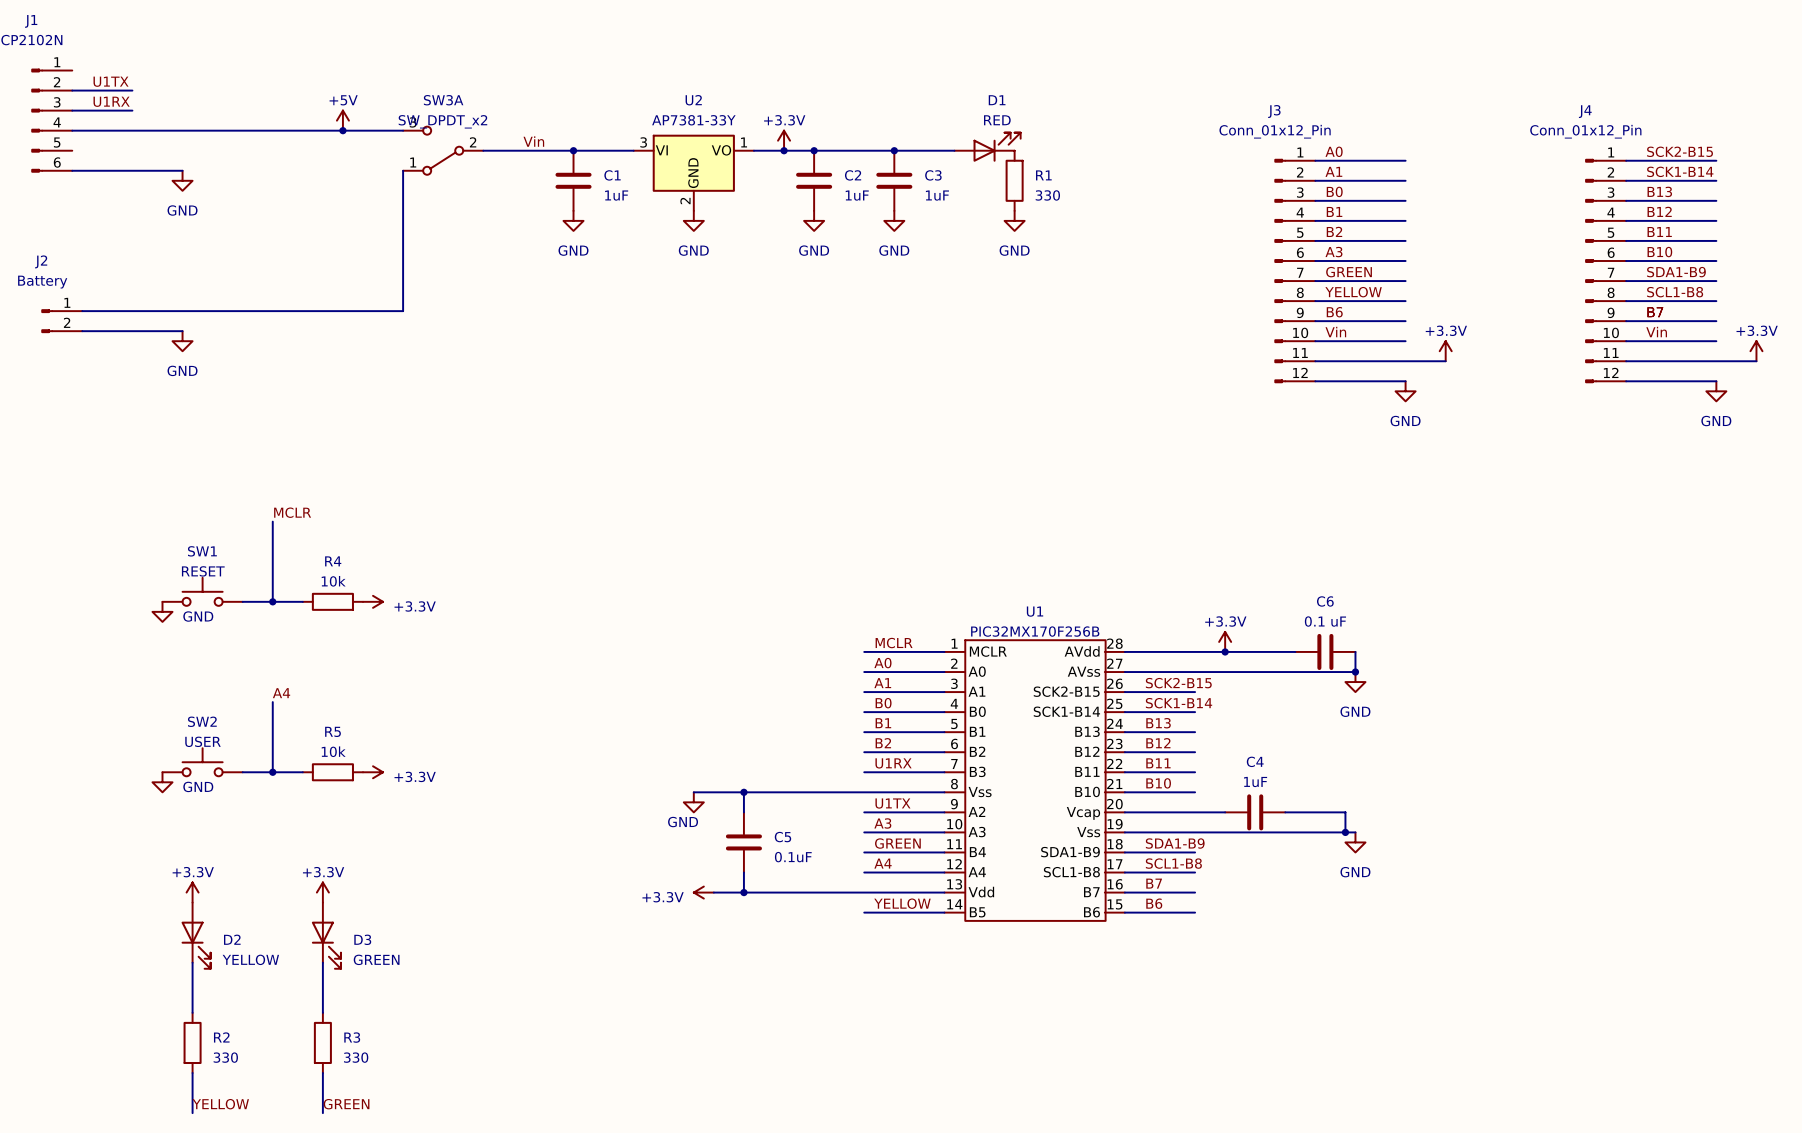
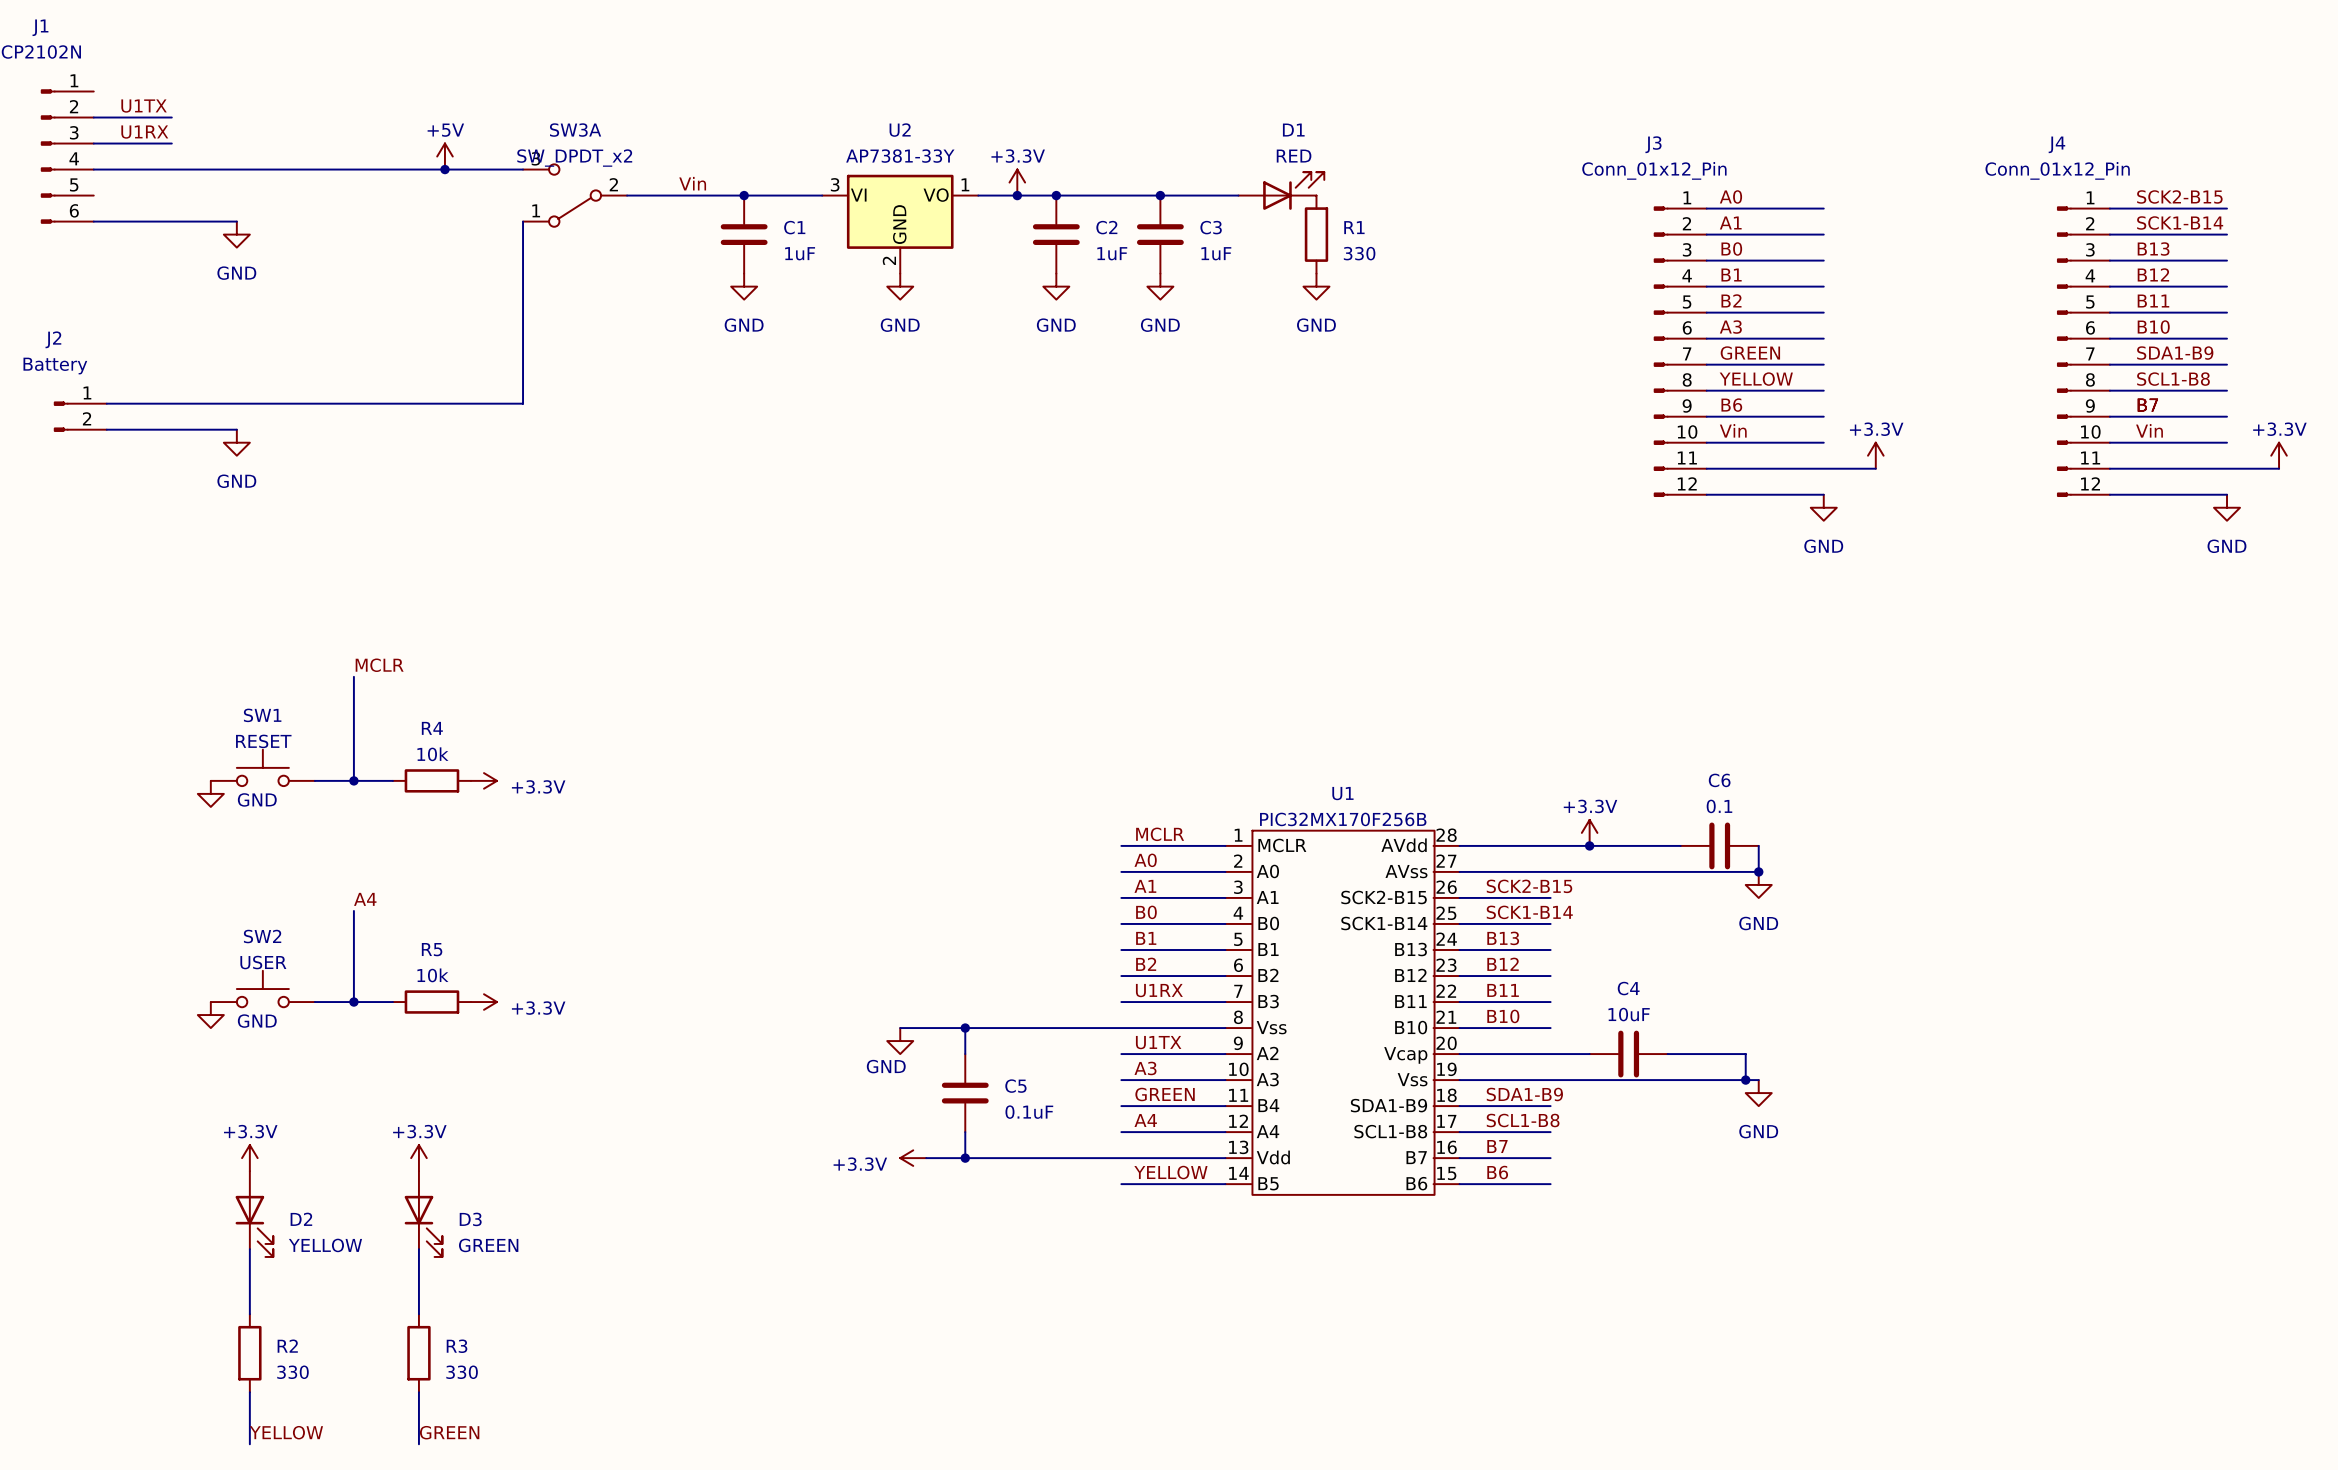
C6 value: 0.1 uF (1325, 621) -> 0.1 (1719, 806)
C4 value: 1uF (1255, 782) -> 10uF (1629, 1014)

